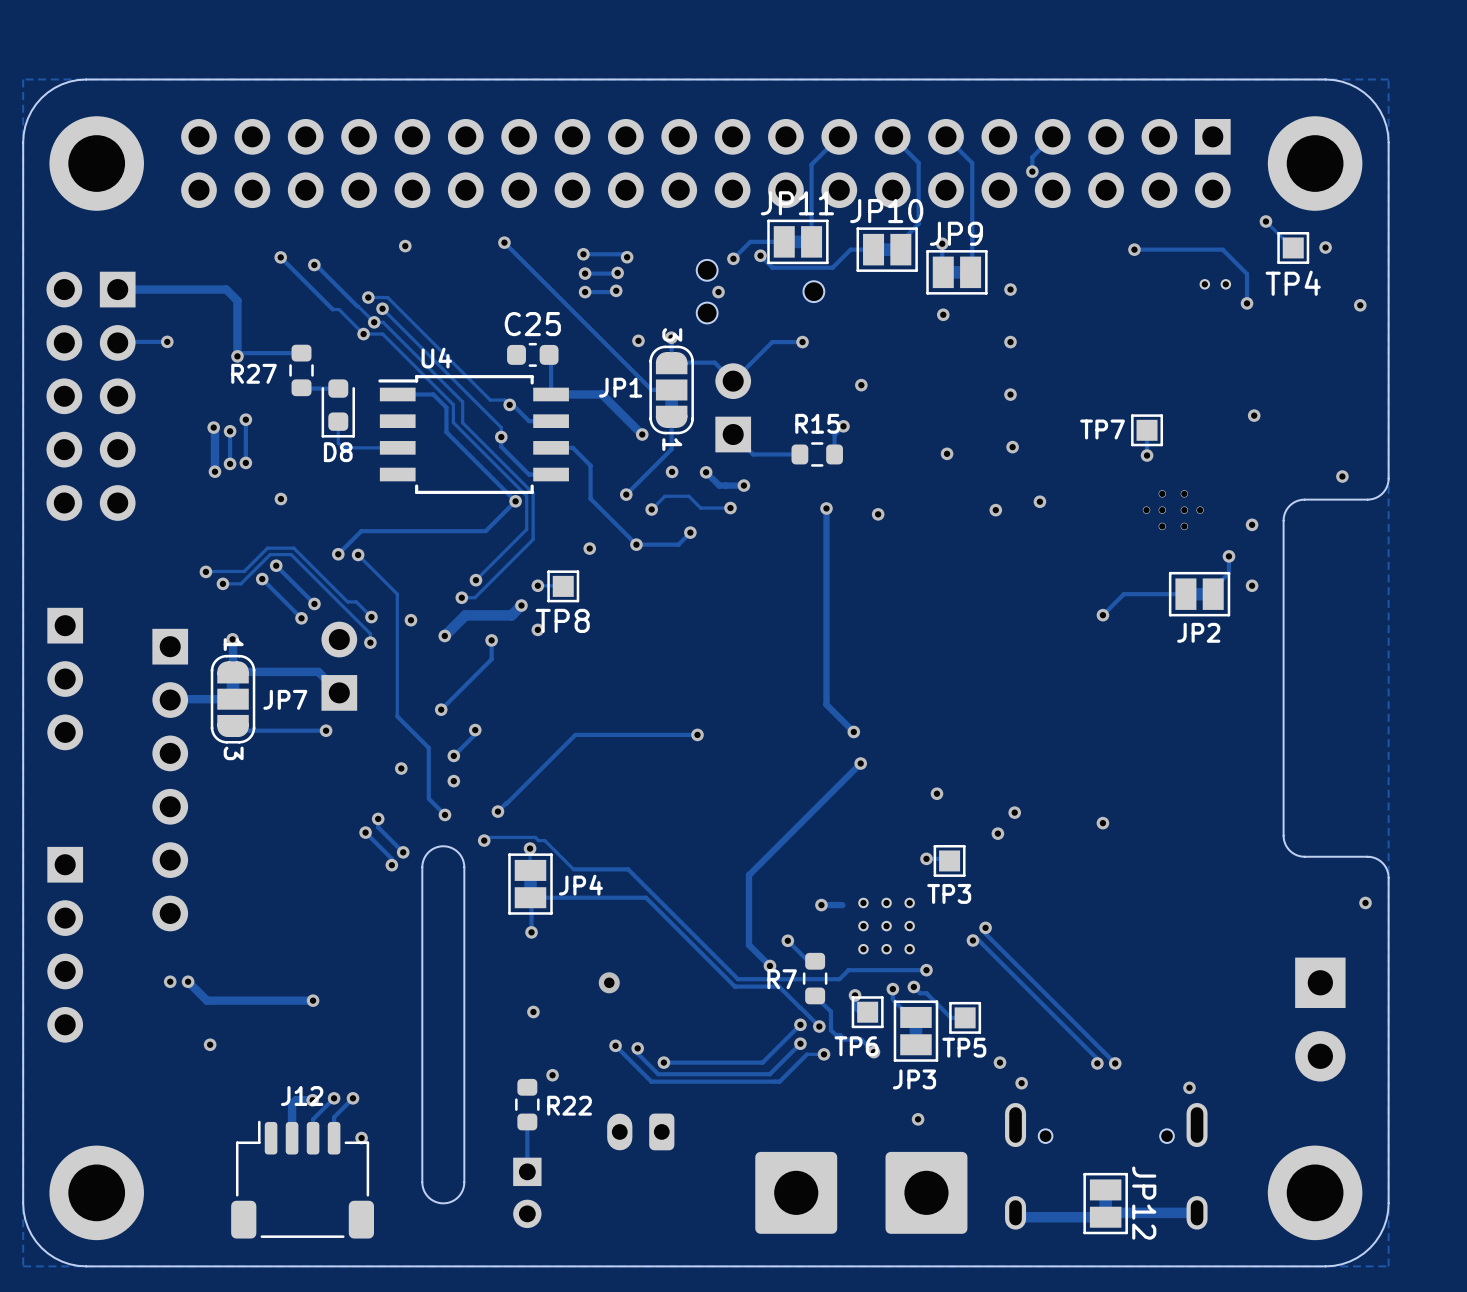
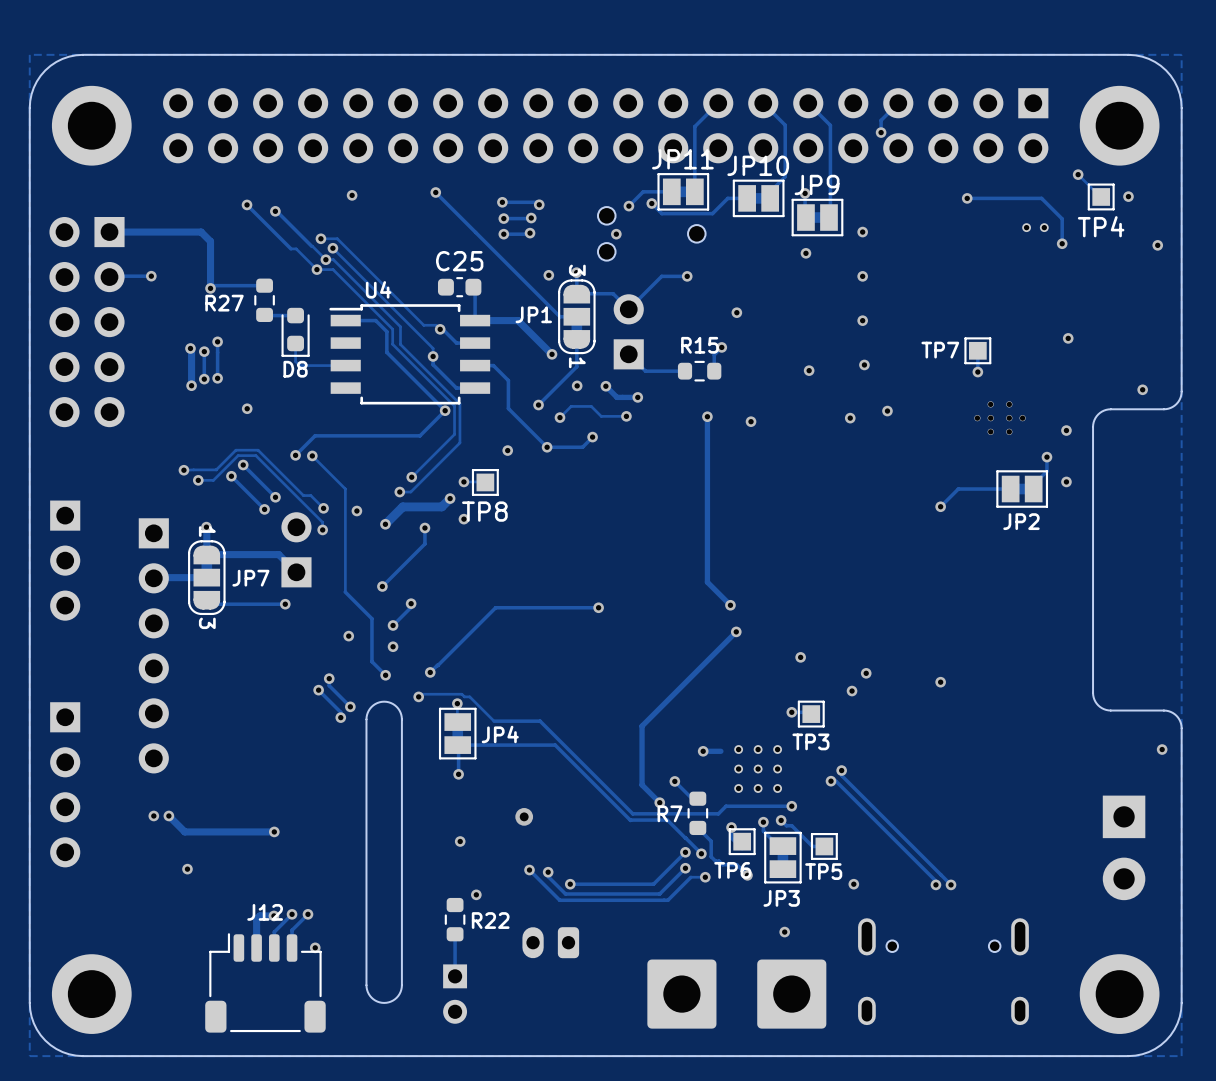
via: (1021, 1083) -> none
via: (1189, 1087) -> none
JP12: (1105, 1203) -> none
track: (1197, 1212) (1110, 1212) (1105, 1217) (1019, 1217) (1015, 1212) -> none

